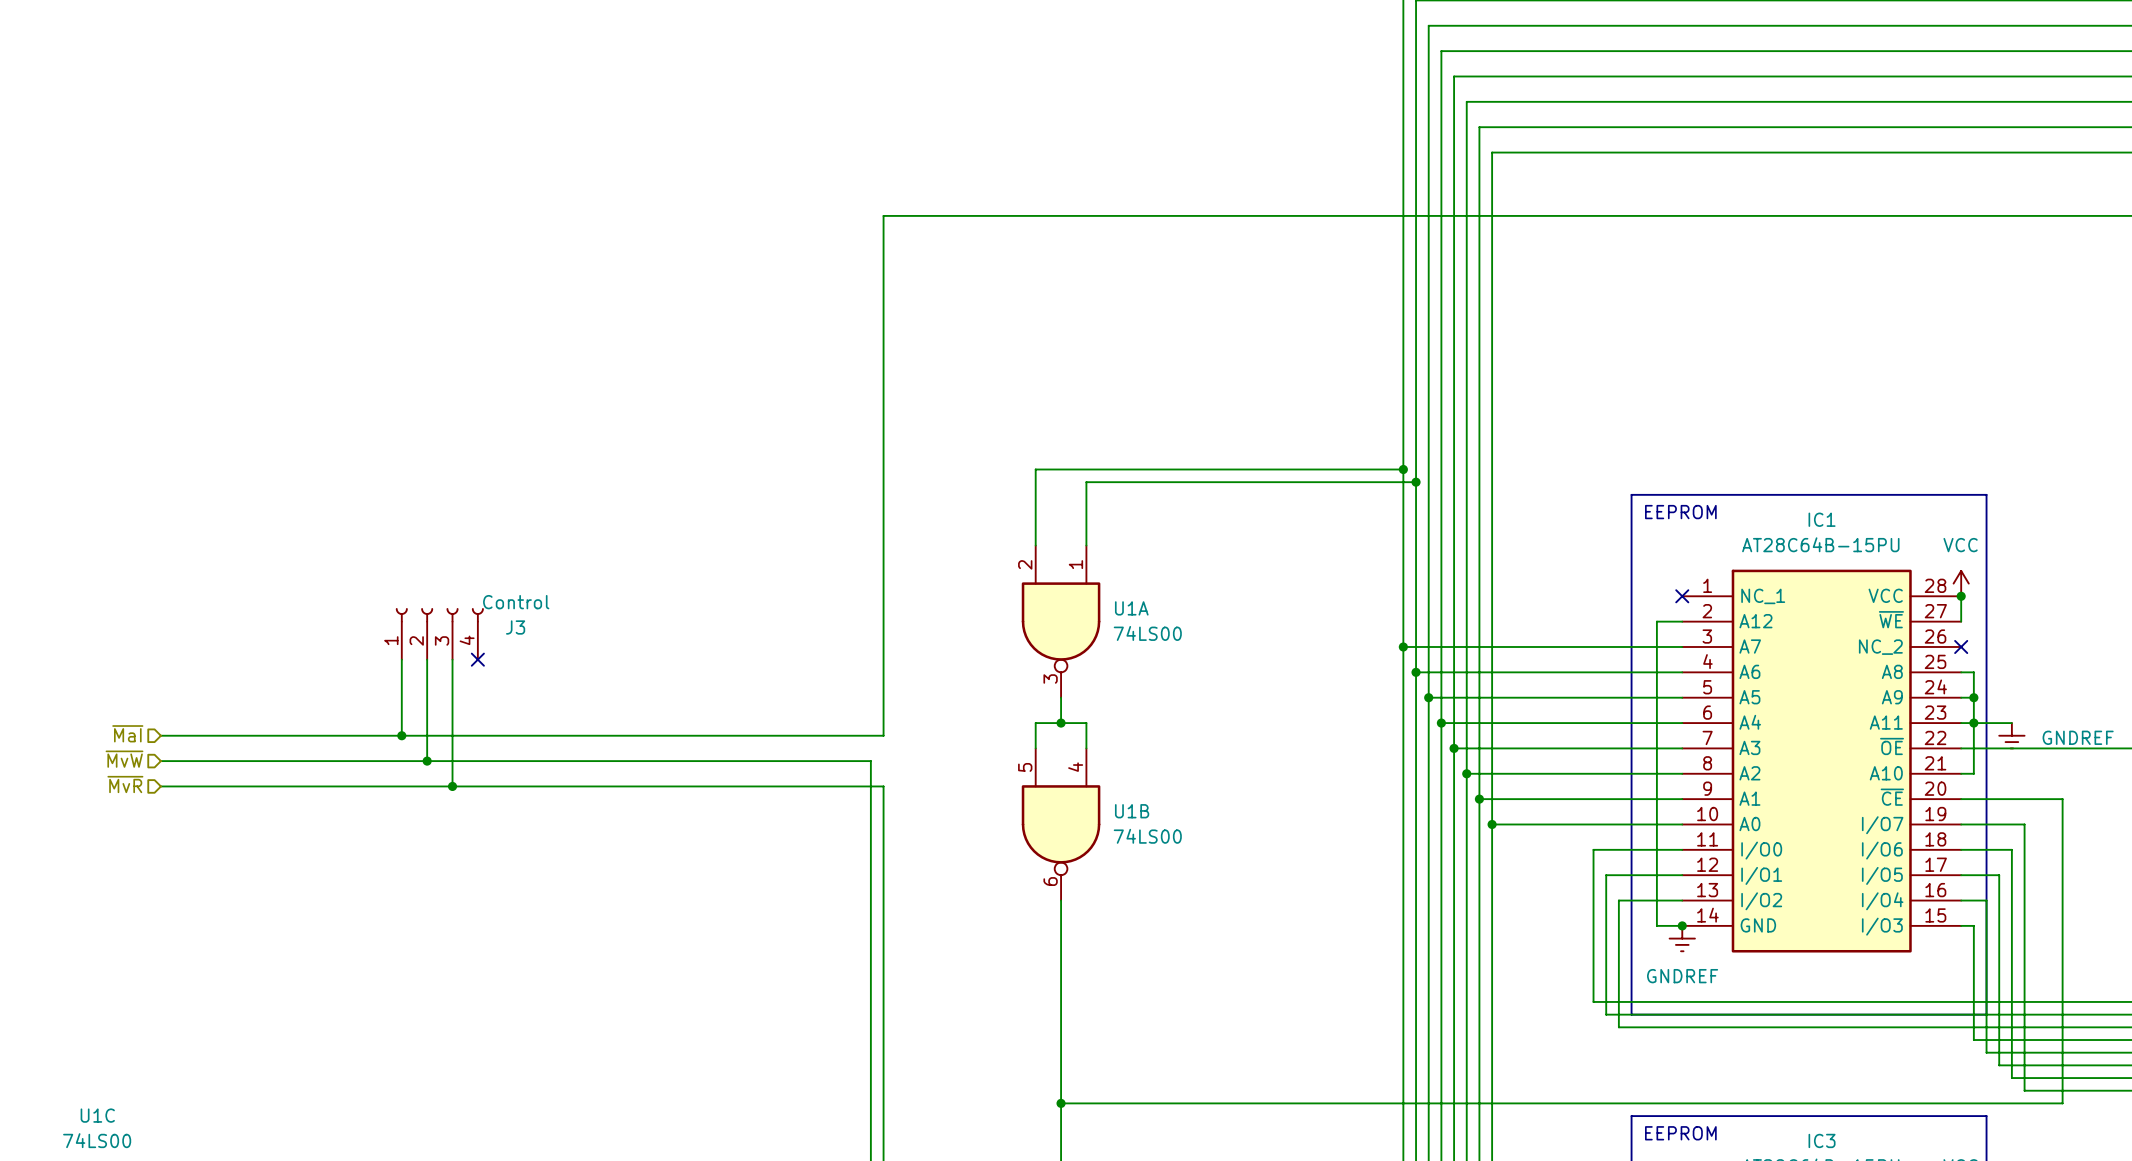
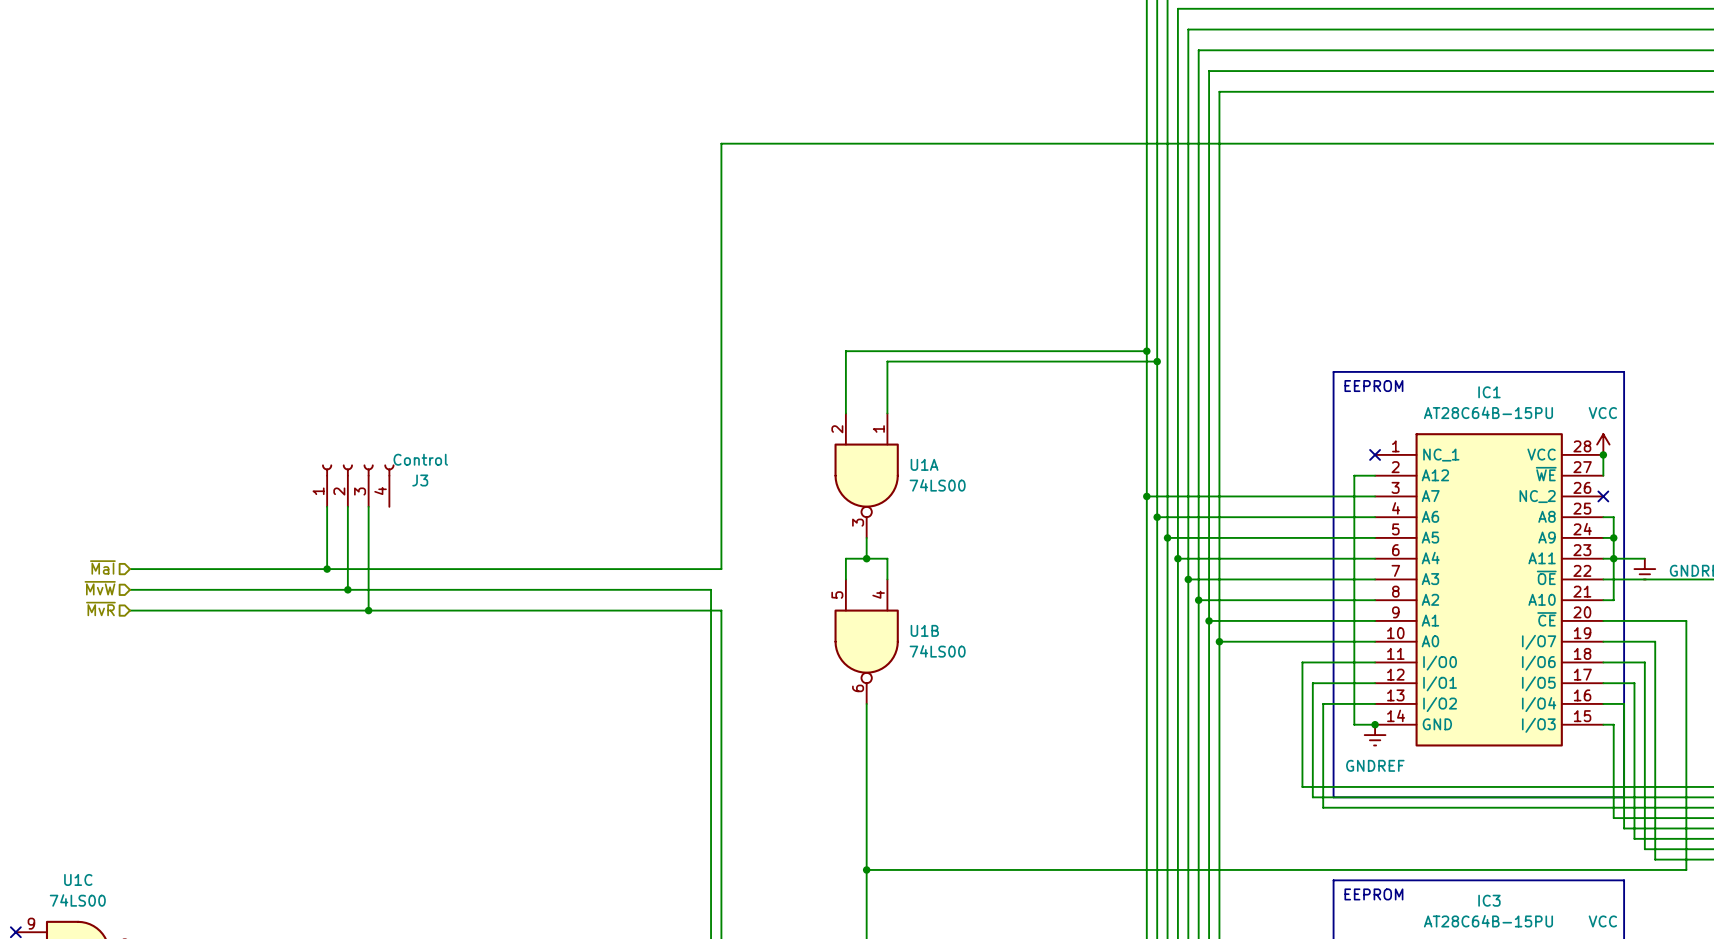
no-connect mark: (477, 659) -> none

